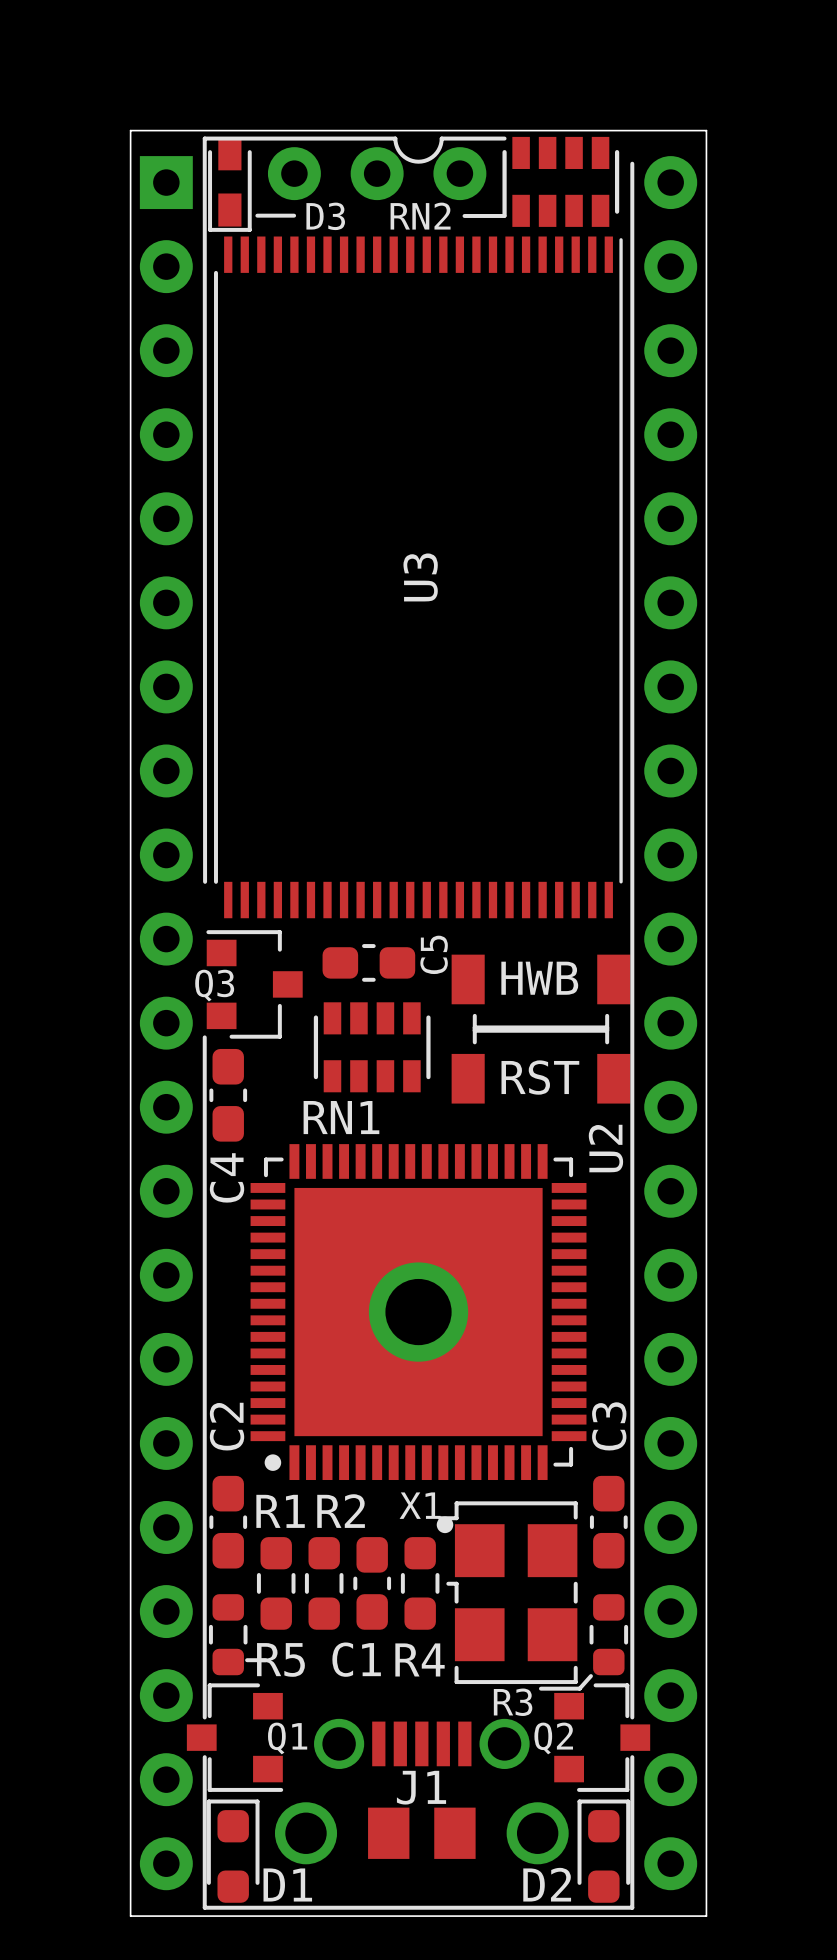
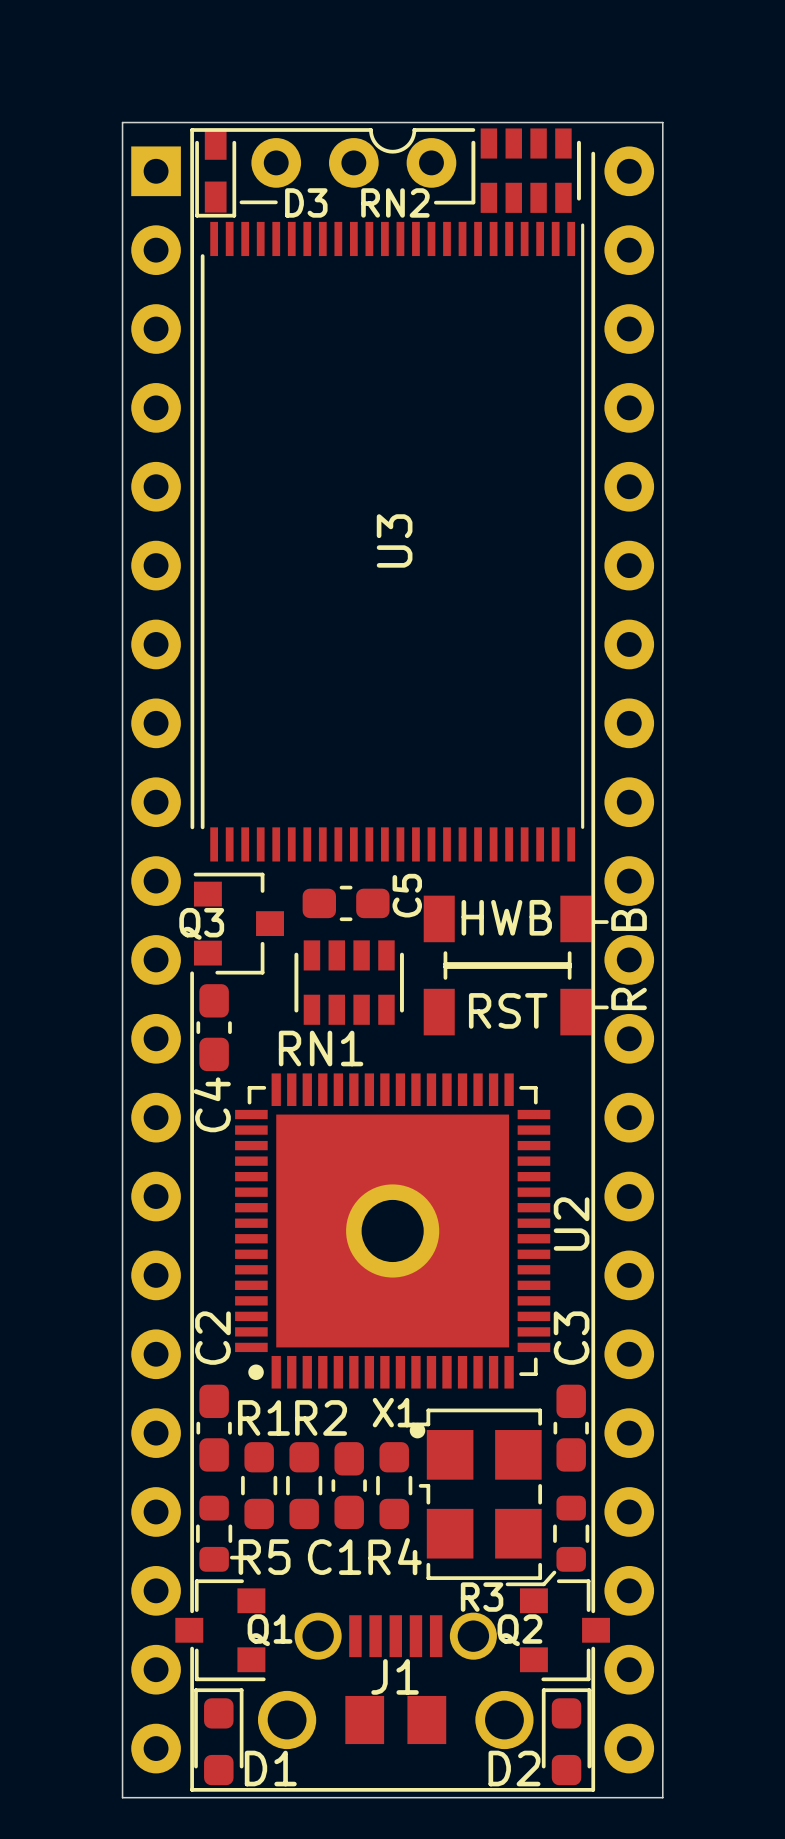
text: none -> B (629, 919)
line: none -> (594, 922) (606, 922)
text: none -> R (629, 998)
line: none -> (594, 1007) (606, 1007)
U2 name position: U2 (605, 1148) -> U2 (571, 1224)

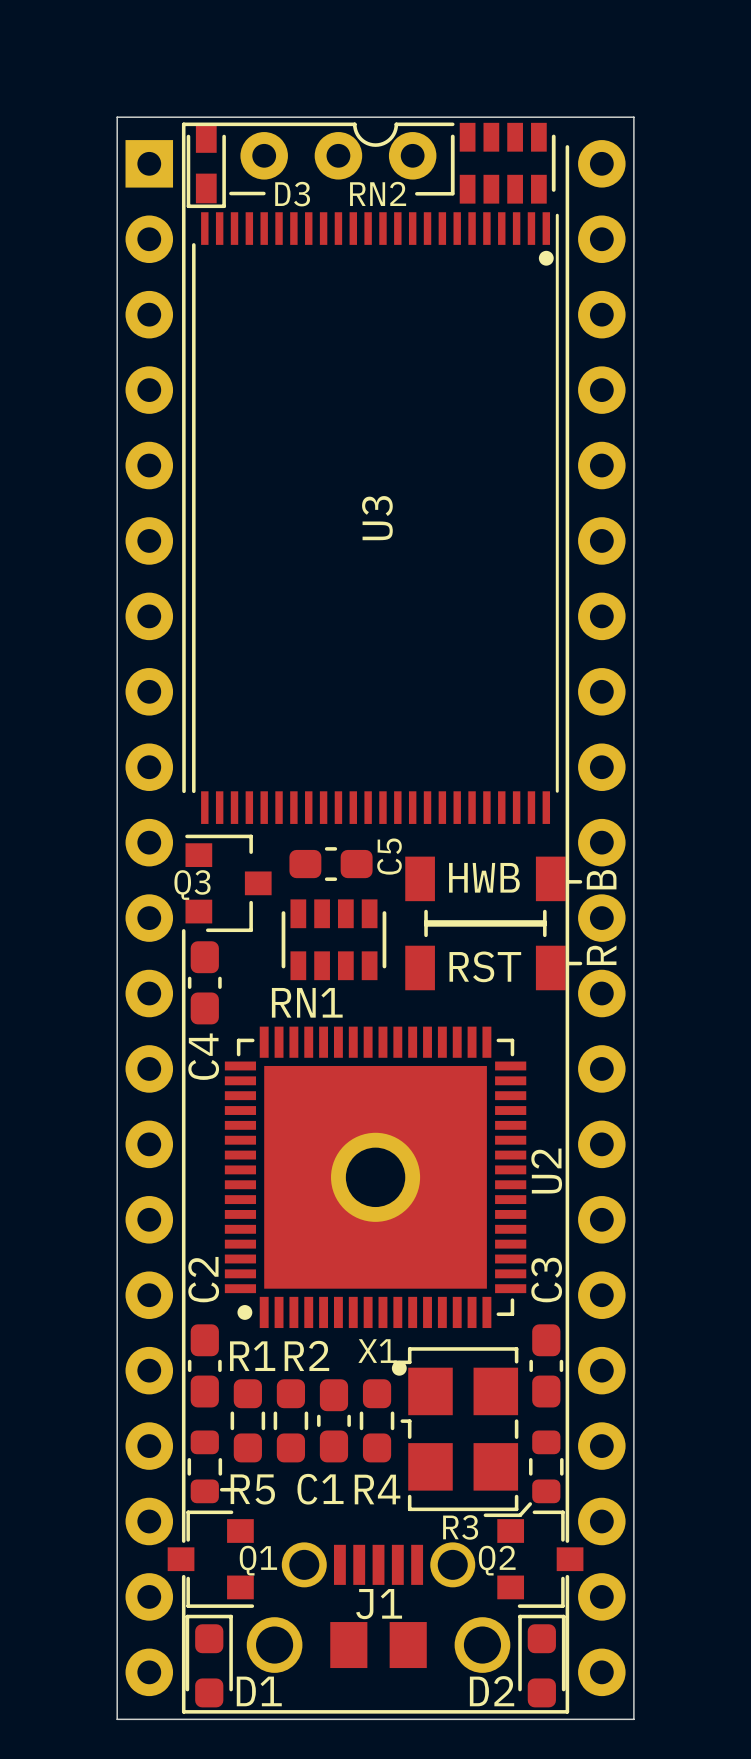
U3 footprint: [200, 221, 585, 862] -> [192, 212, 559, 824]

